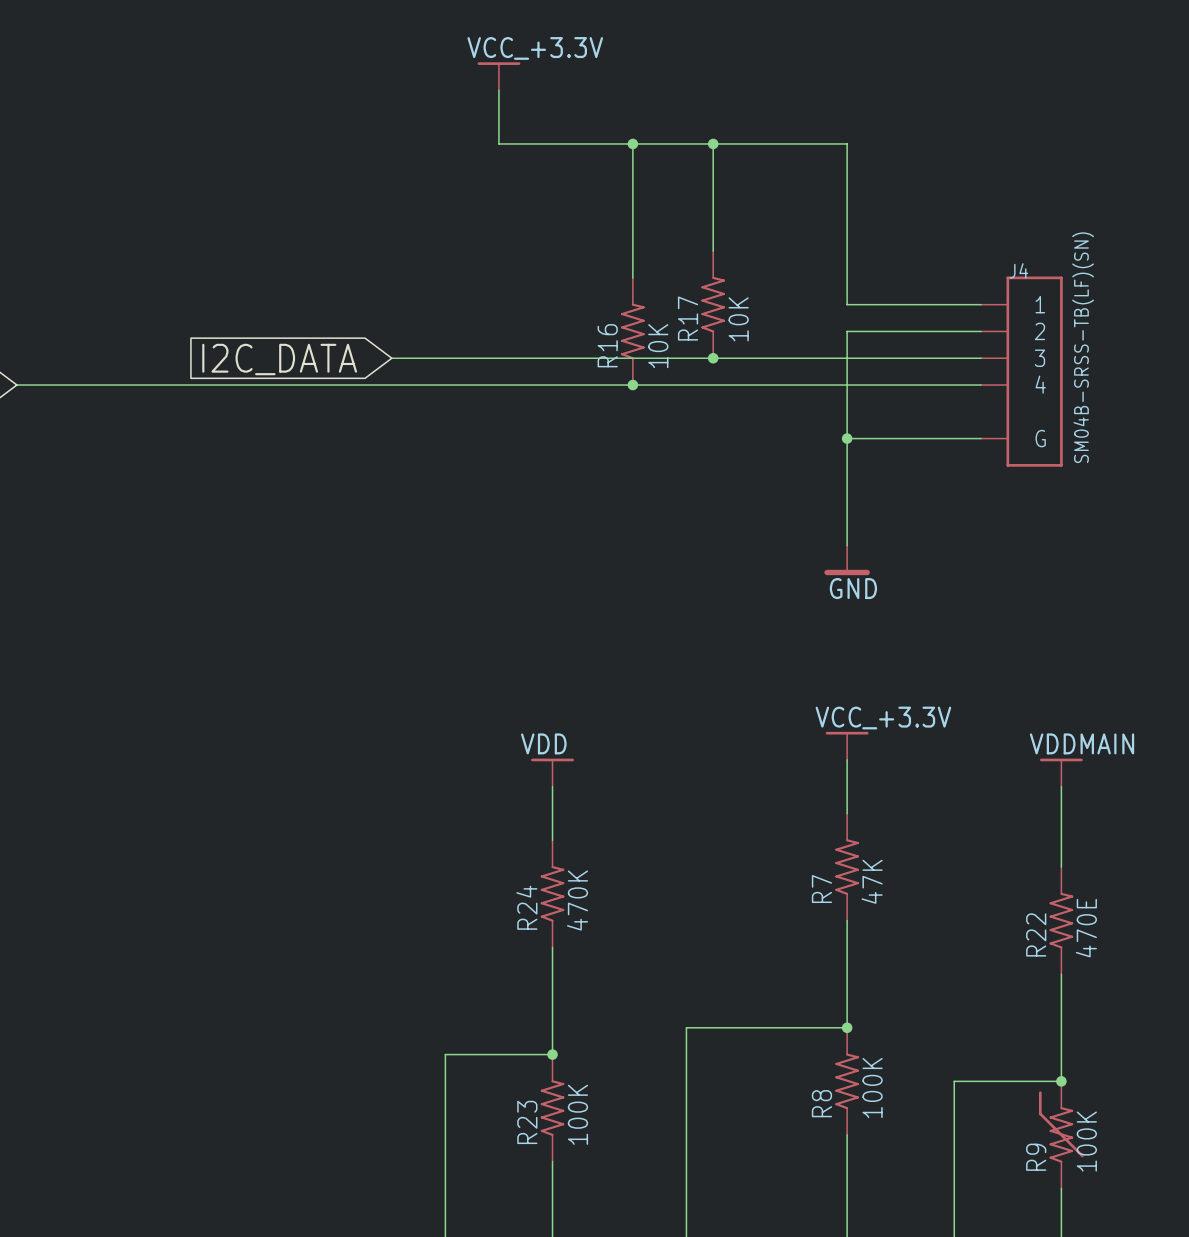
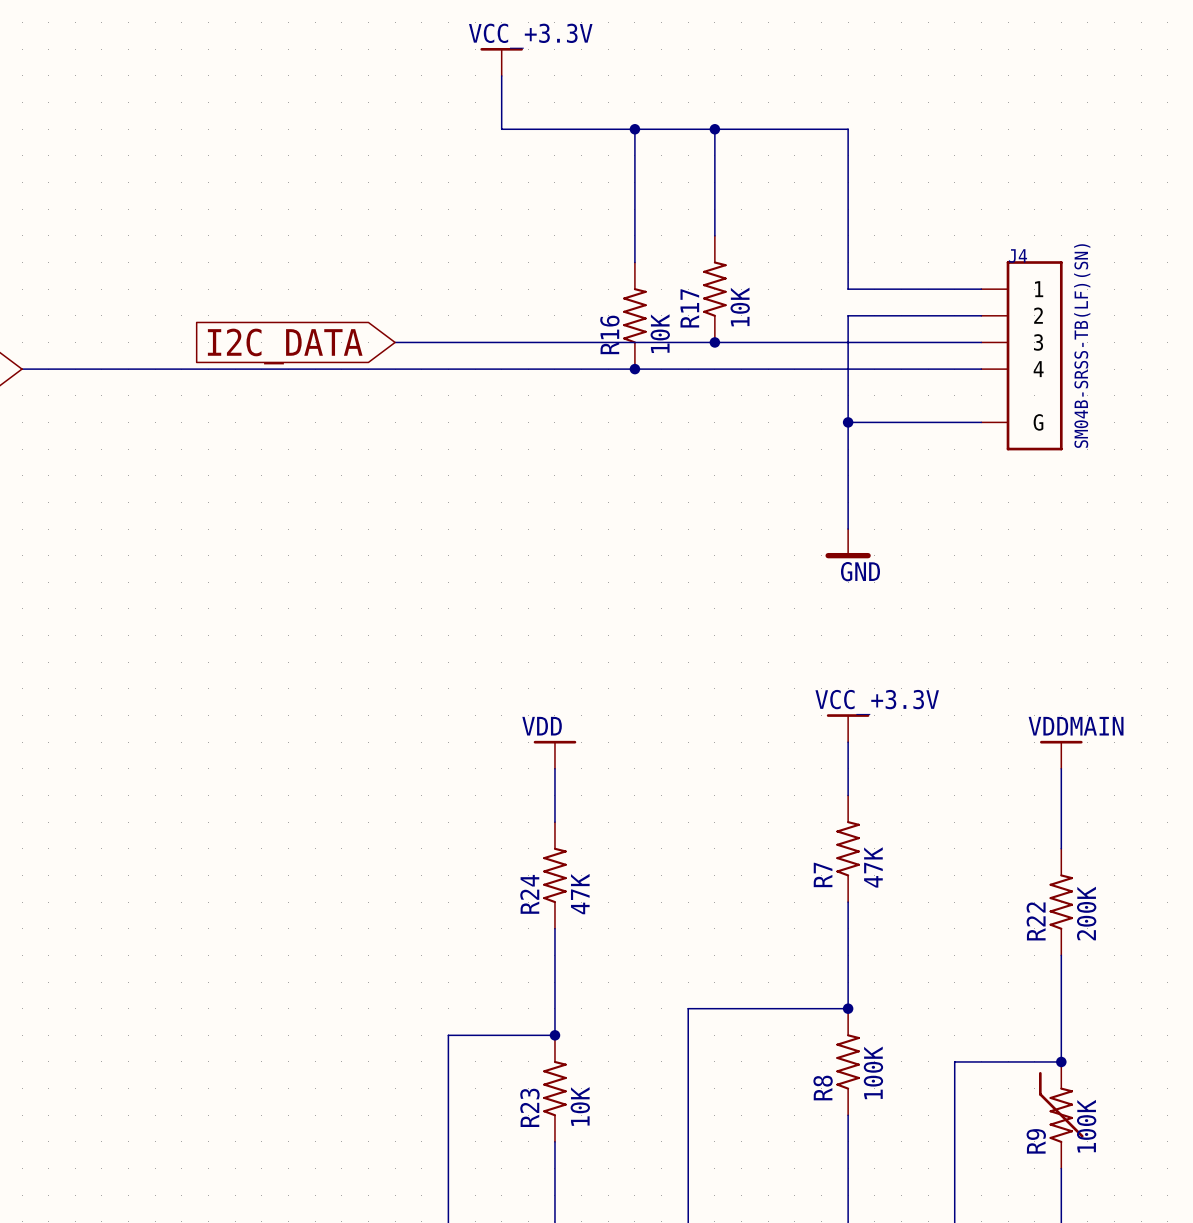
R24 value: 470K (577, 900) -> 47K (580, 894)
R22 value: 470E (1086, 928) -> 200K (1086, 913)
R23 value: 100K (577, 1114) -> 10K (580, 1106)

